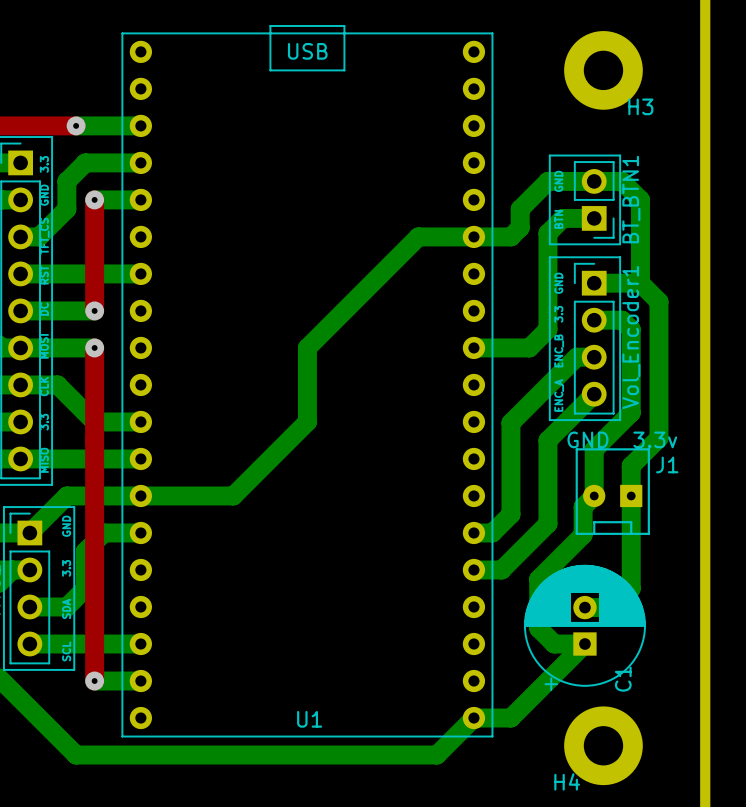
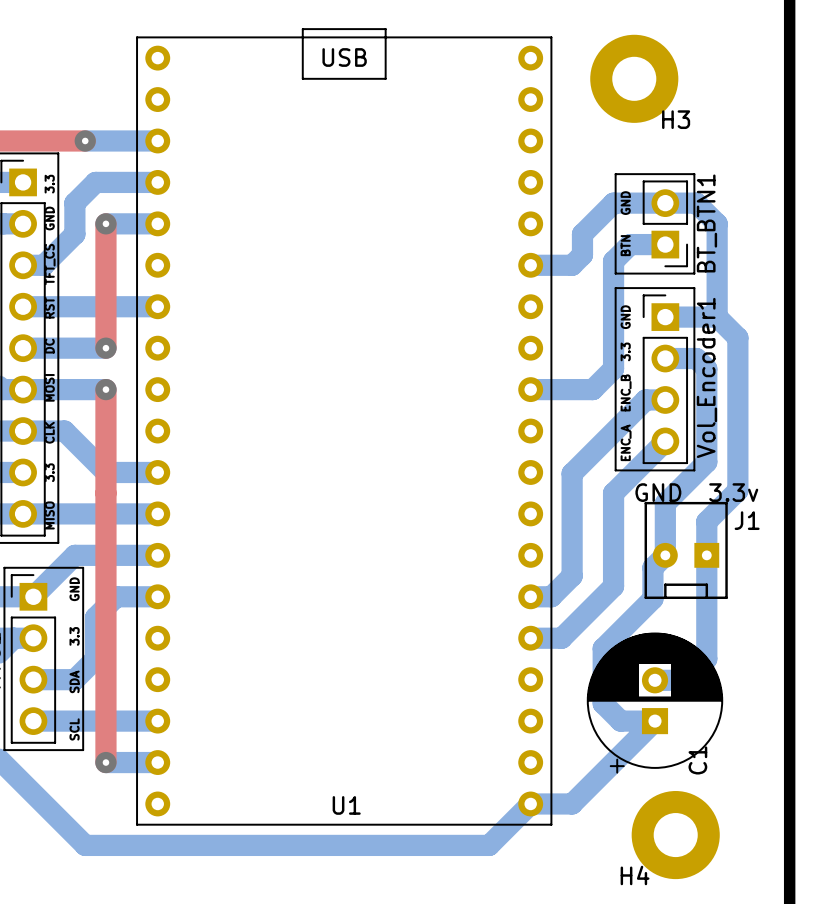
H3 position: (603, 70) -> (634, 78)
bottom track: (473, 236) (418, 236) (307, 347) (307, 421) (233, 495) (140, 495) -> none

